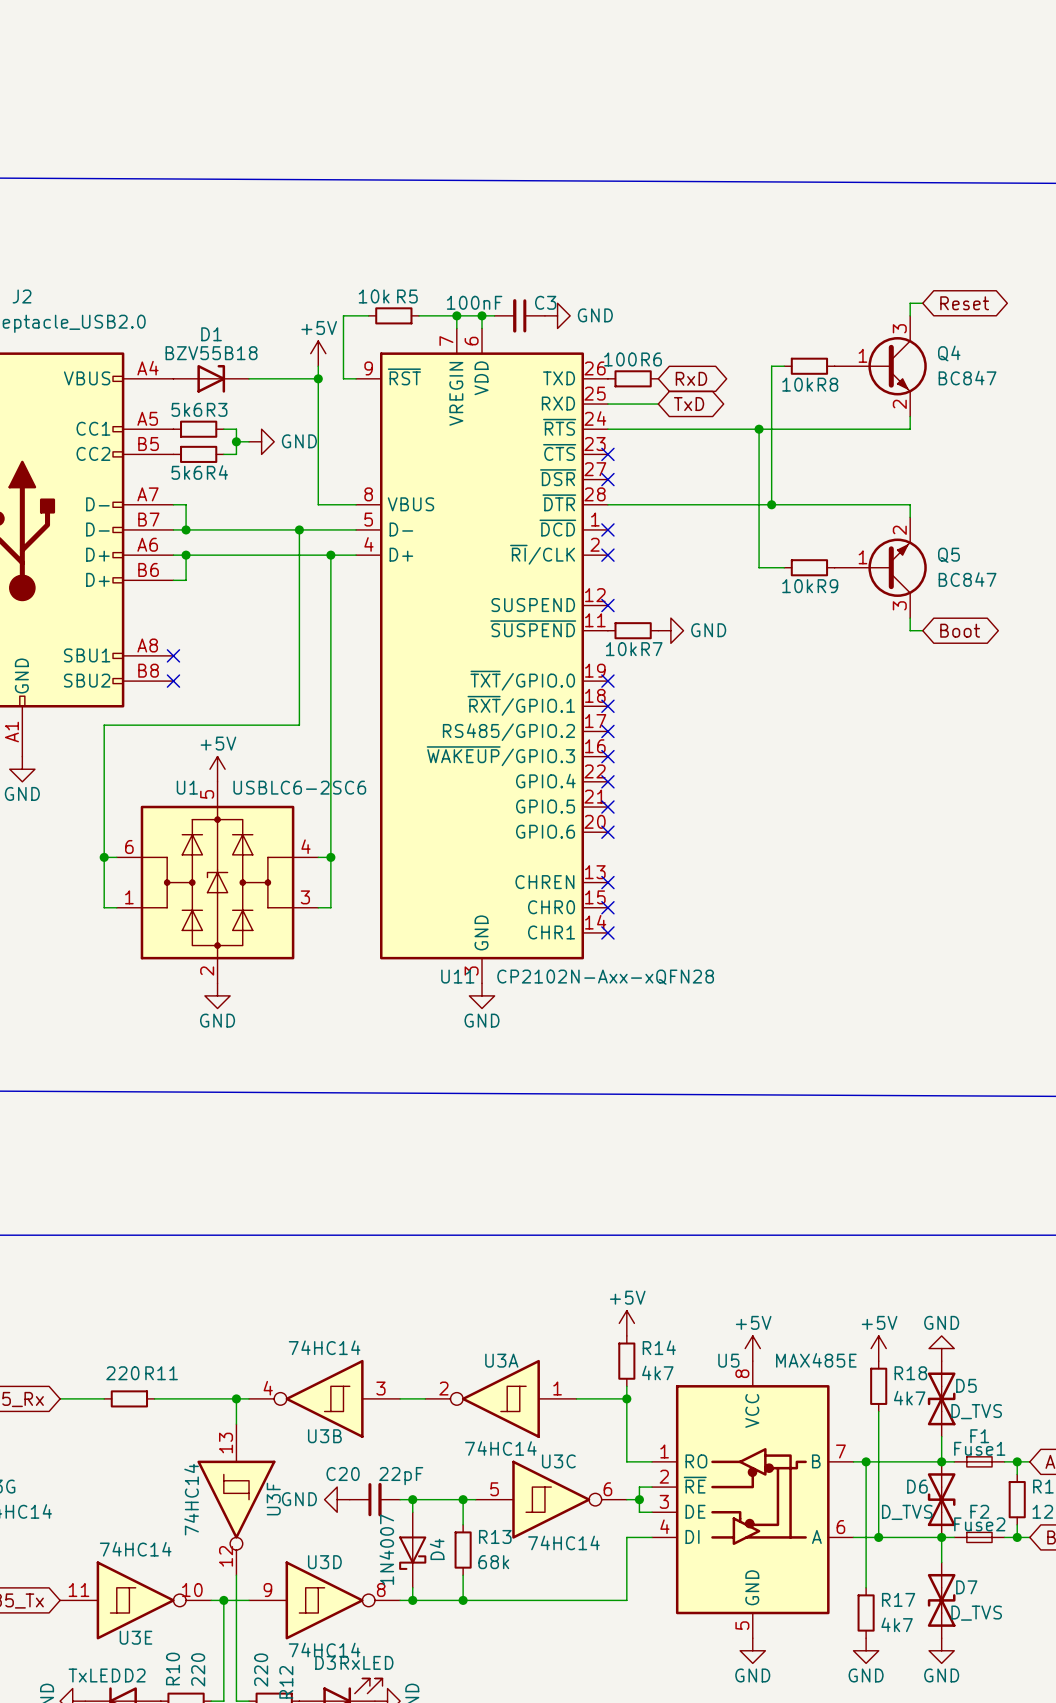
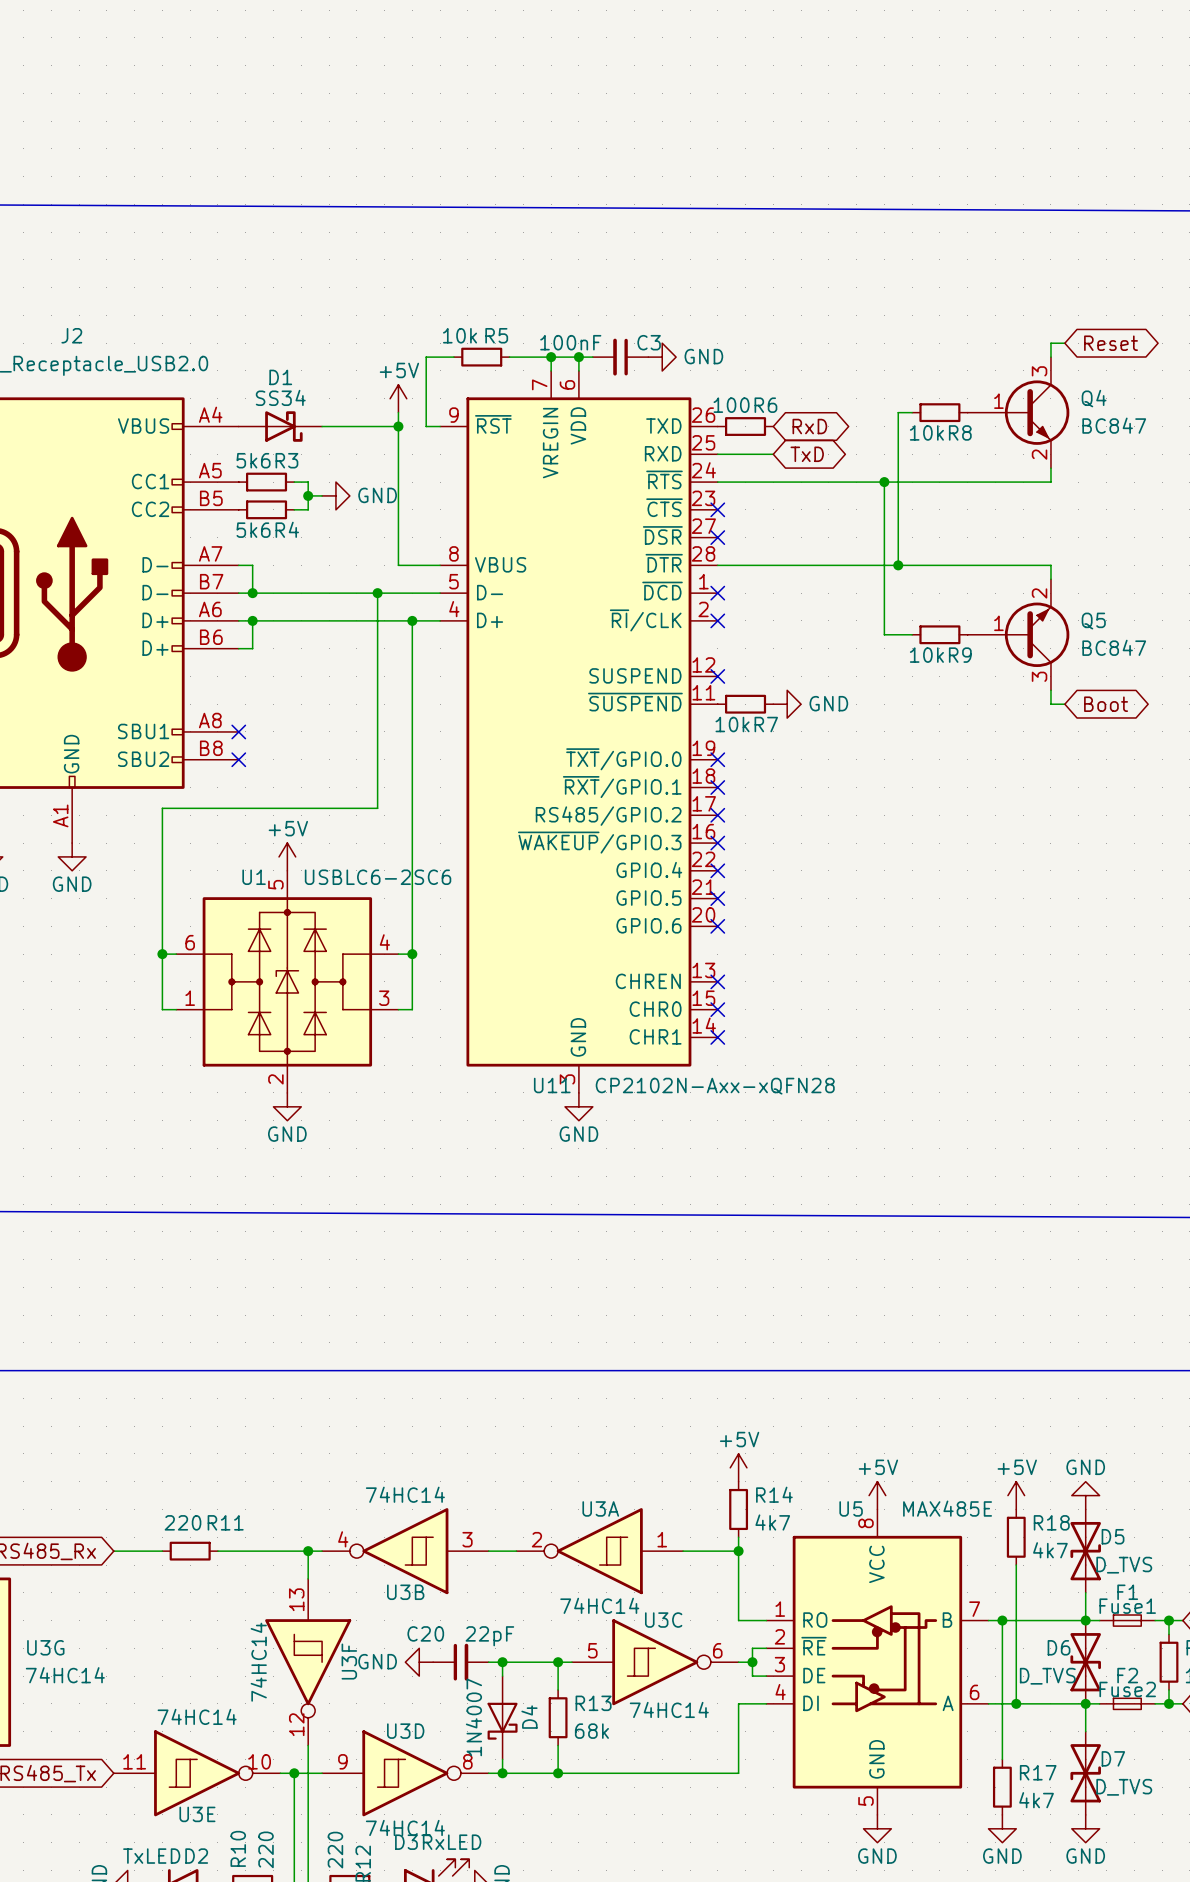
D1 value: BZV55B18 (211, 353) -> SS34 (280, 397)
D1 symbol: [173, 364, 250, 393] -> [238, 411, 323, 442]

